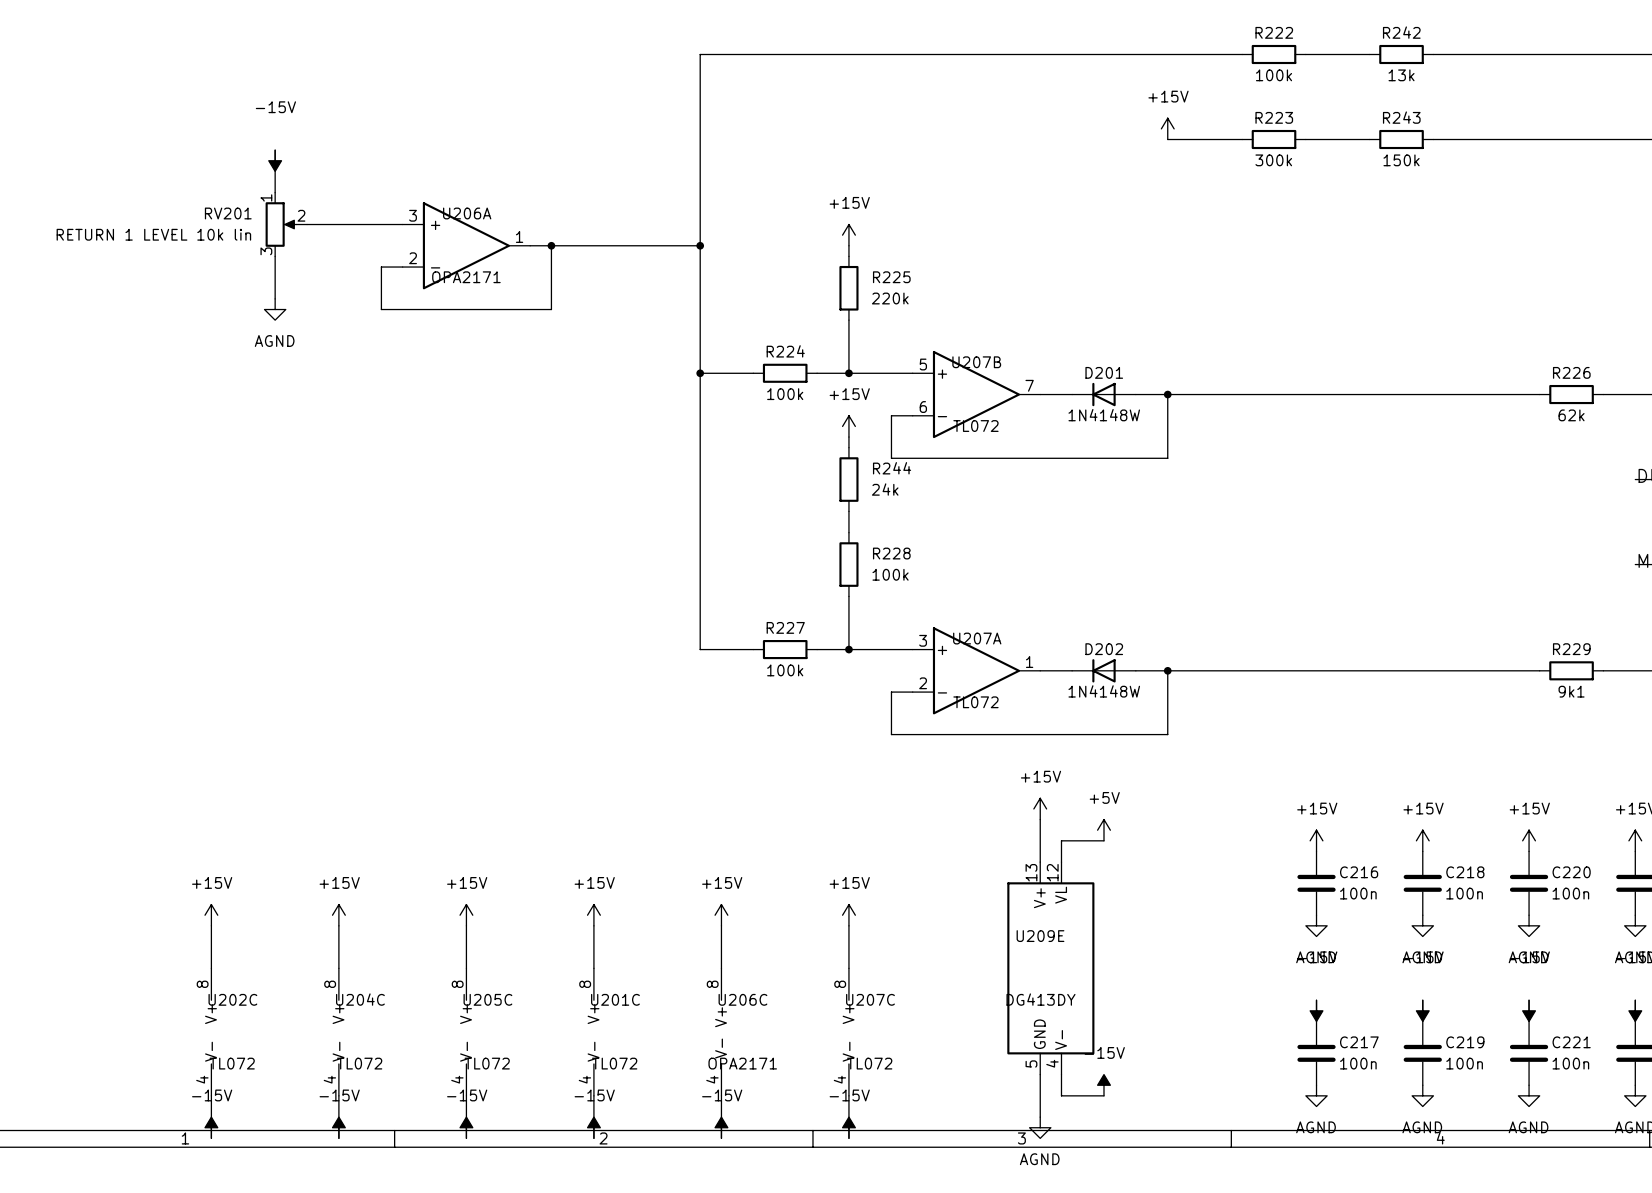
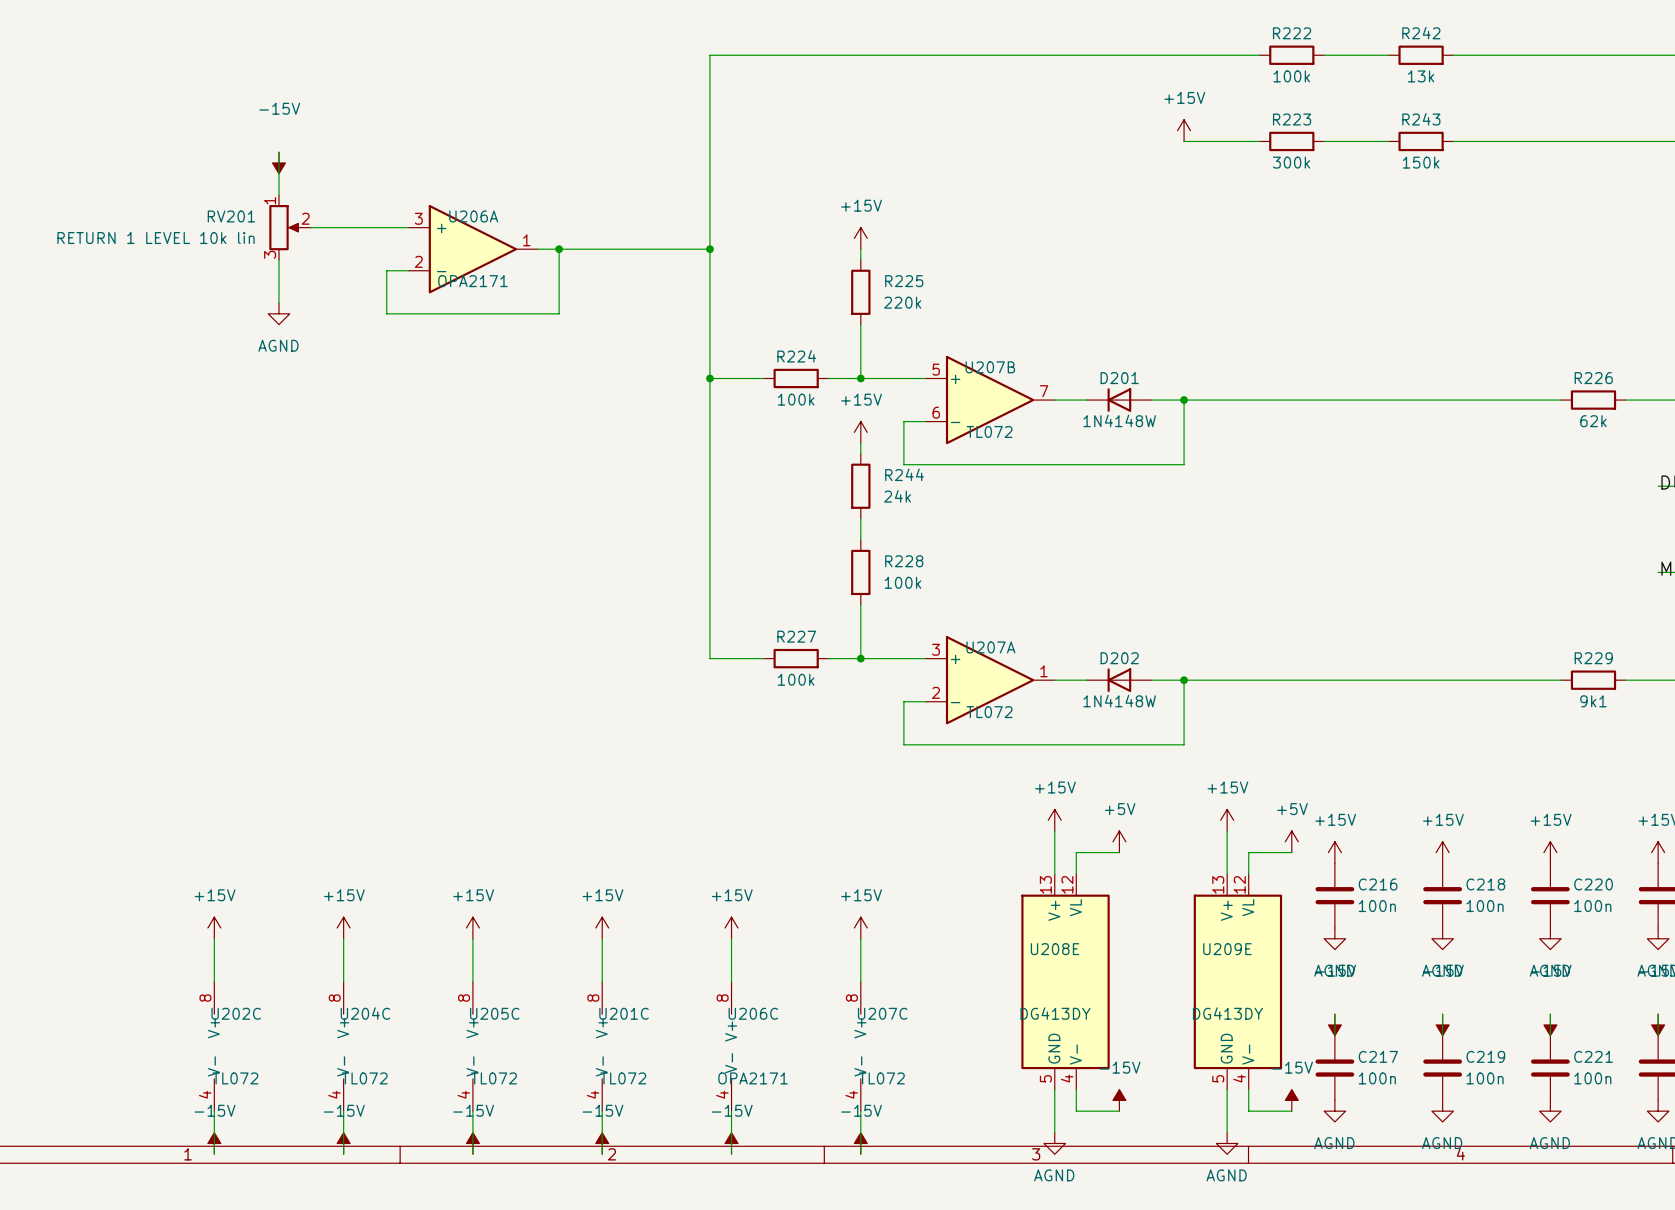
power symbol: none -> +15V (1227, 820)
wire: none -> (1227, 831) (1227, 874)
power symbol: none -> +5V (1291, 841)
wire: none -> (1291, 852) (1248, 852) (1248, 874)
U209E name: U209E (1040, 936) -> U208E (1055, 949)
U209E: none -> DG413DY (1237, 981)
wire: none -> (1227, 1089) (1227, 1132)
wire: none -> (1248, 1089) (1248, 1111) (1291, 1111)
power symbol: none -> -15V (1291, 1100)
power symbol: none -> AGND (1227, 1143)

